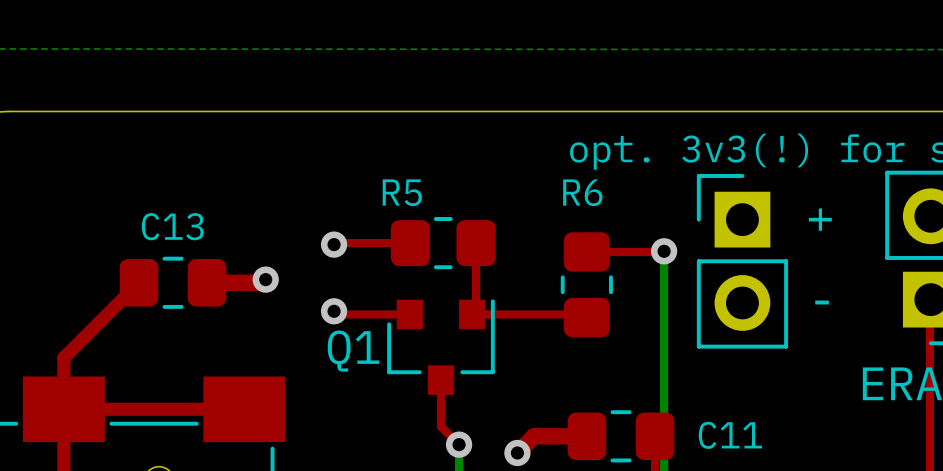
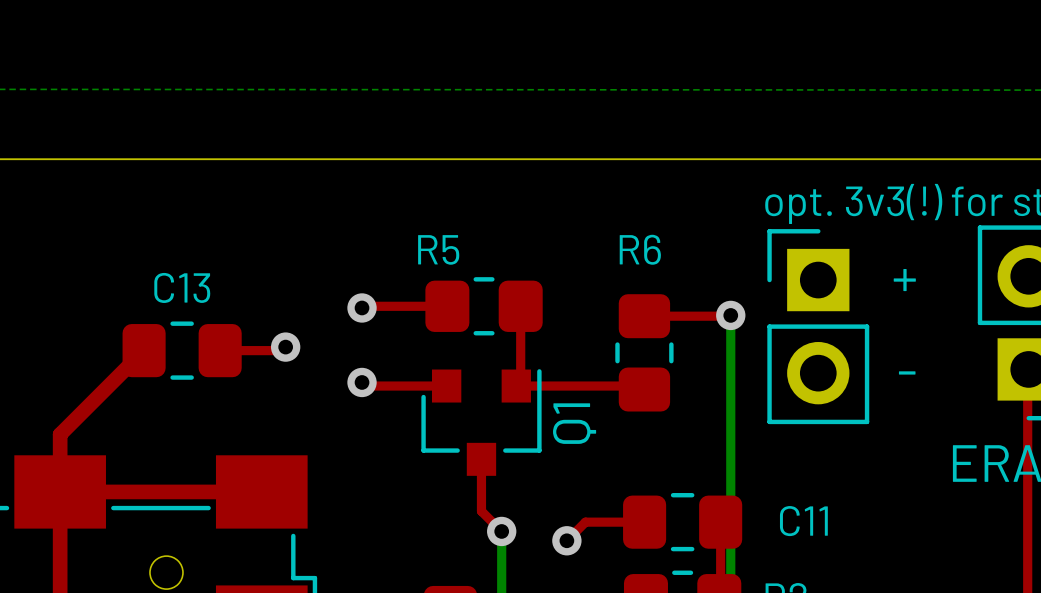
top track width: thick (207, 282) (262, 282) -> thin (220, 350) (282, 350)
Q1 name rotation: 0° (353, 351) -> 90° counterclockwise (574, 423)
Q1 name position: Q1 (353, 351) -> Q1 (574, 423)
top track width: thick (586, 436) (534, 436) (517, 452) -> thin (644, 522) (585, 522) (566, 540)

